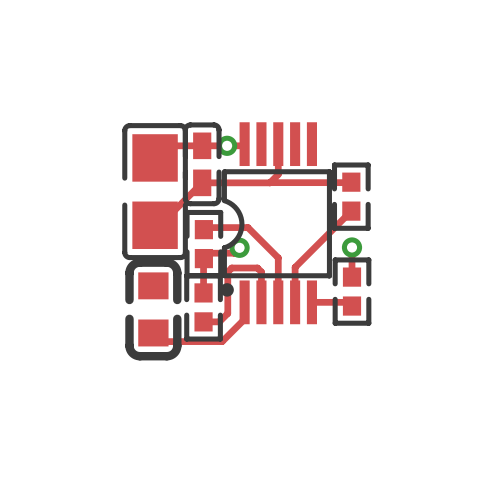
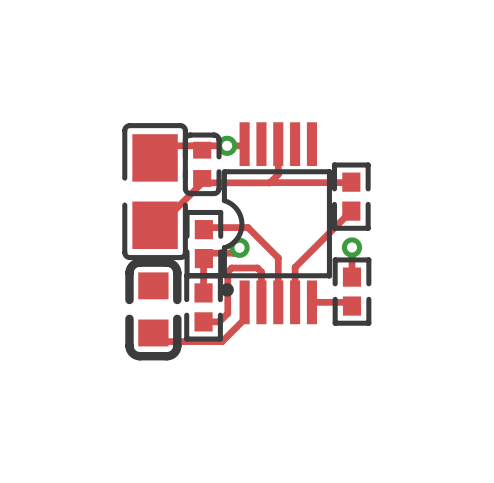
part footprint: [182, 122, 222, 207] -> [182, 132, 222, 197]

